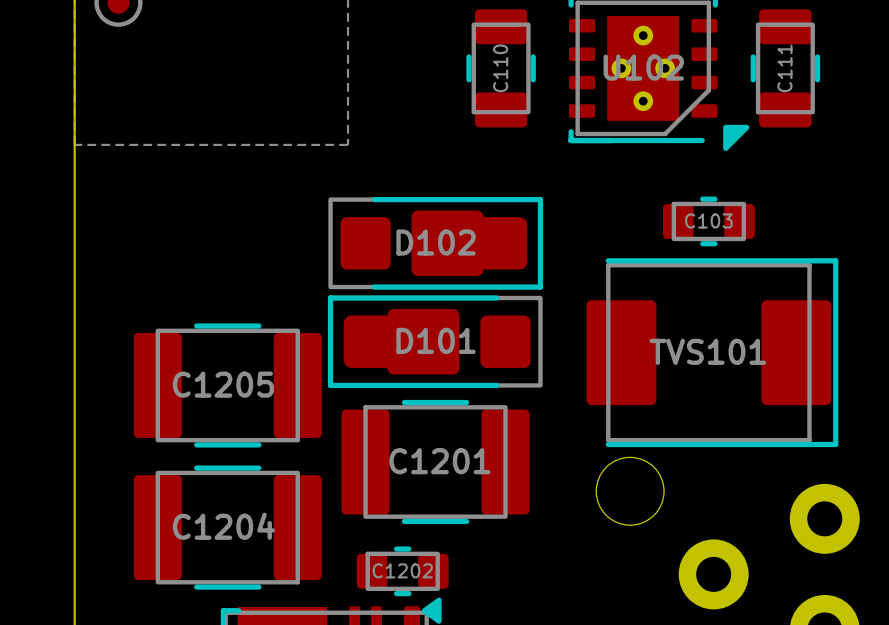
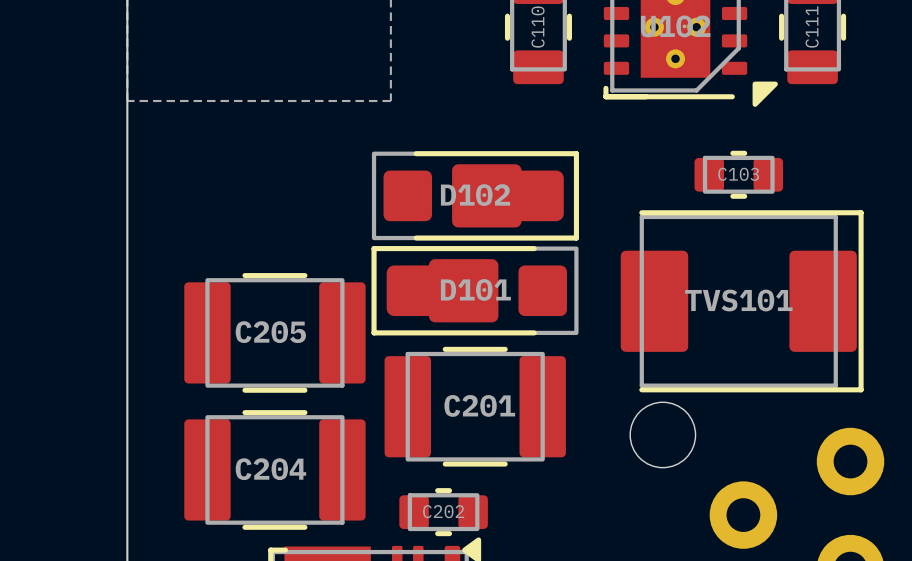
C1205 name: C1205 (223, 384) -> C205 (270, 332)
C1201 name: C1201 (439, 461) -> C201 (479, 405)
C1204 name: C1204 (223, 526) -> C204 (270, 469)
C1202 name: C1202 (402, 570) -> C202 (443, 511)

